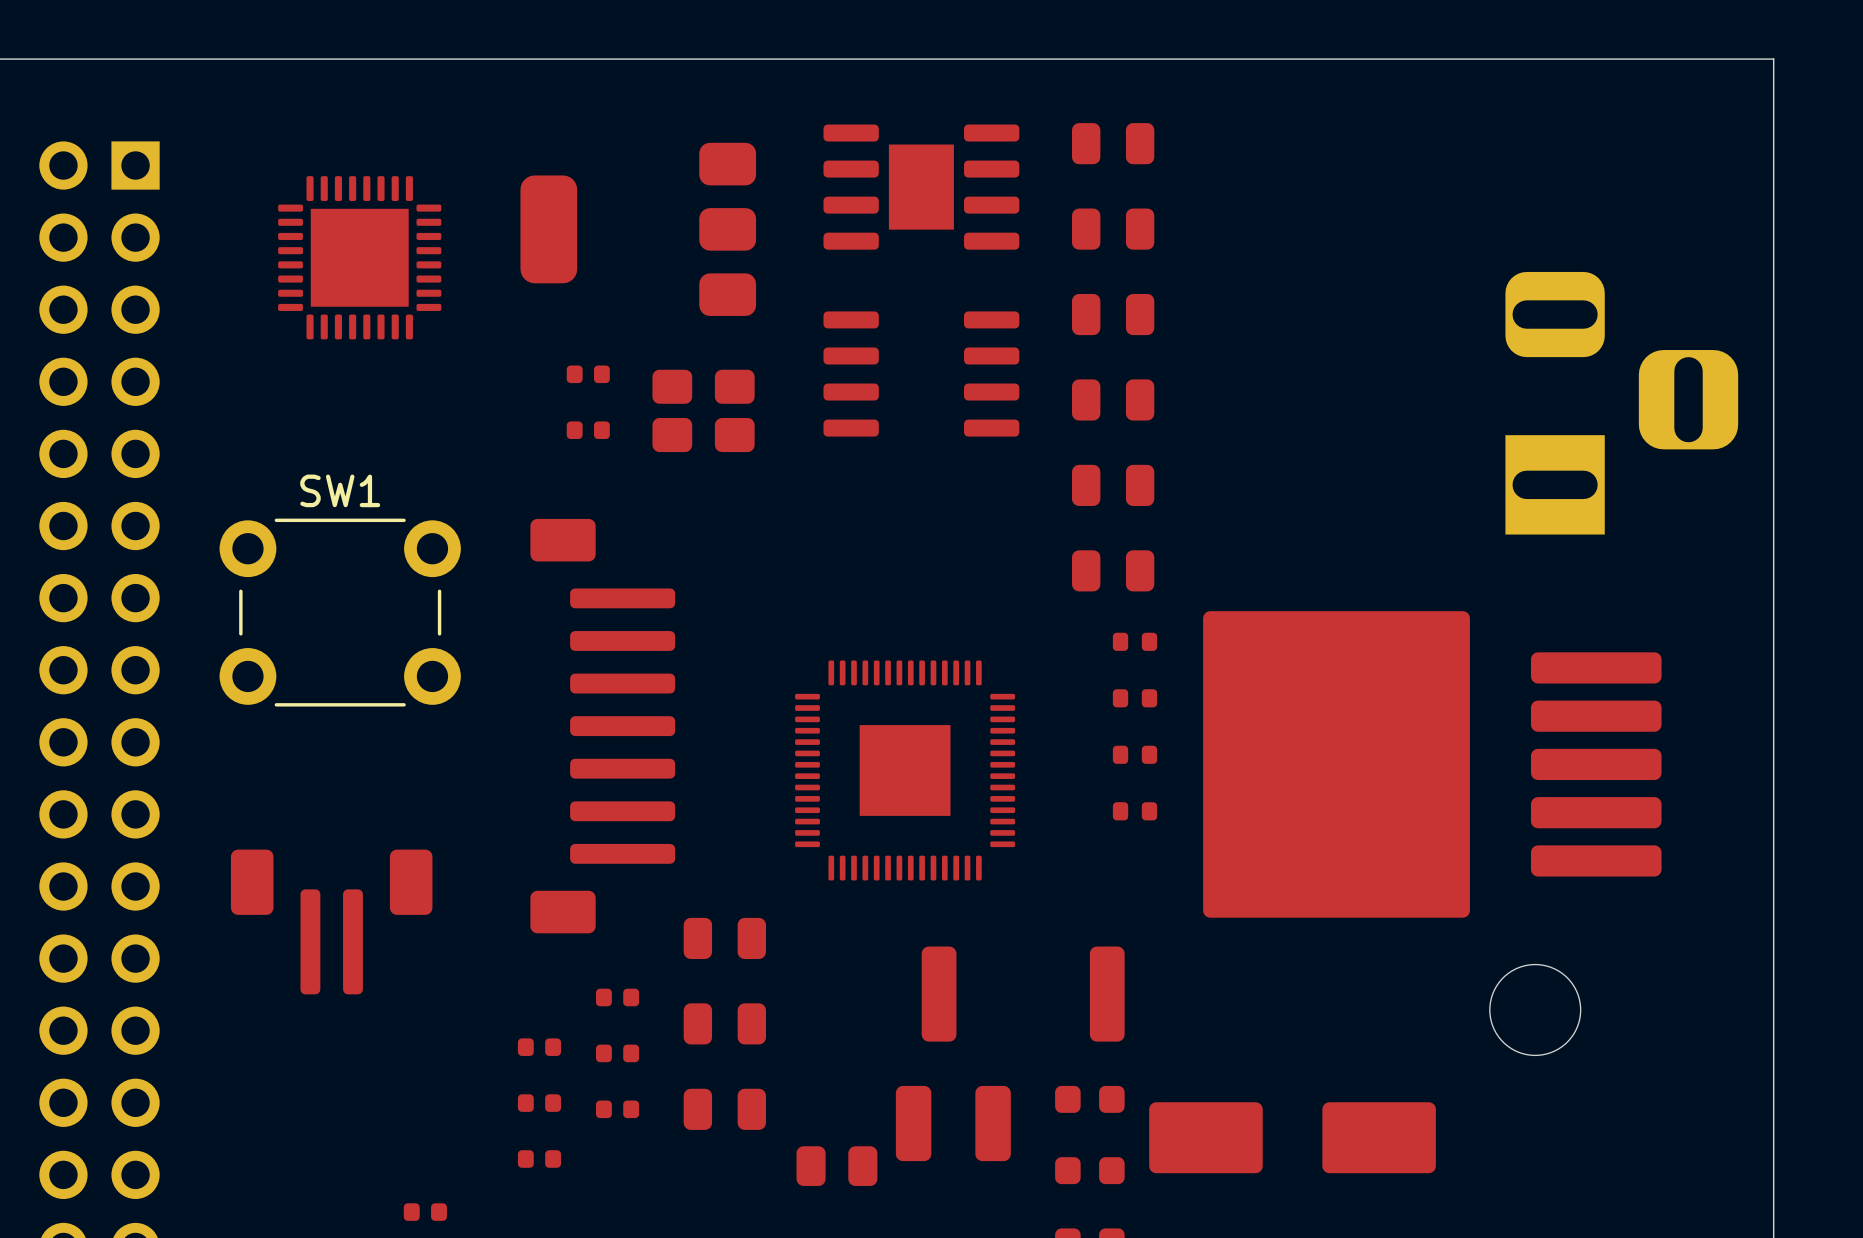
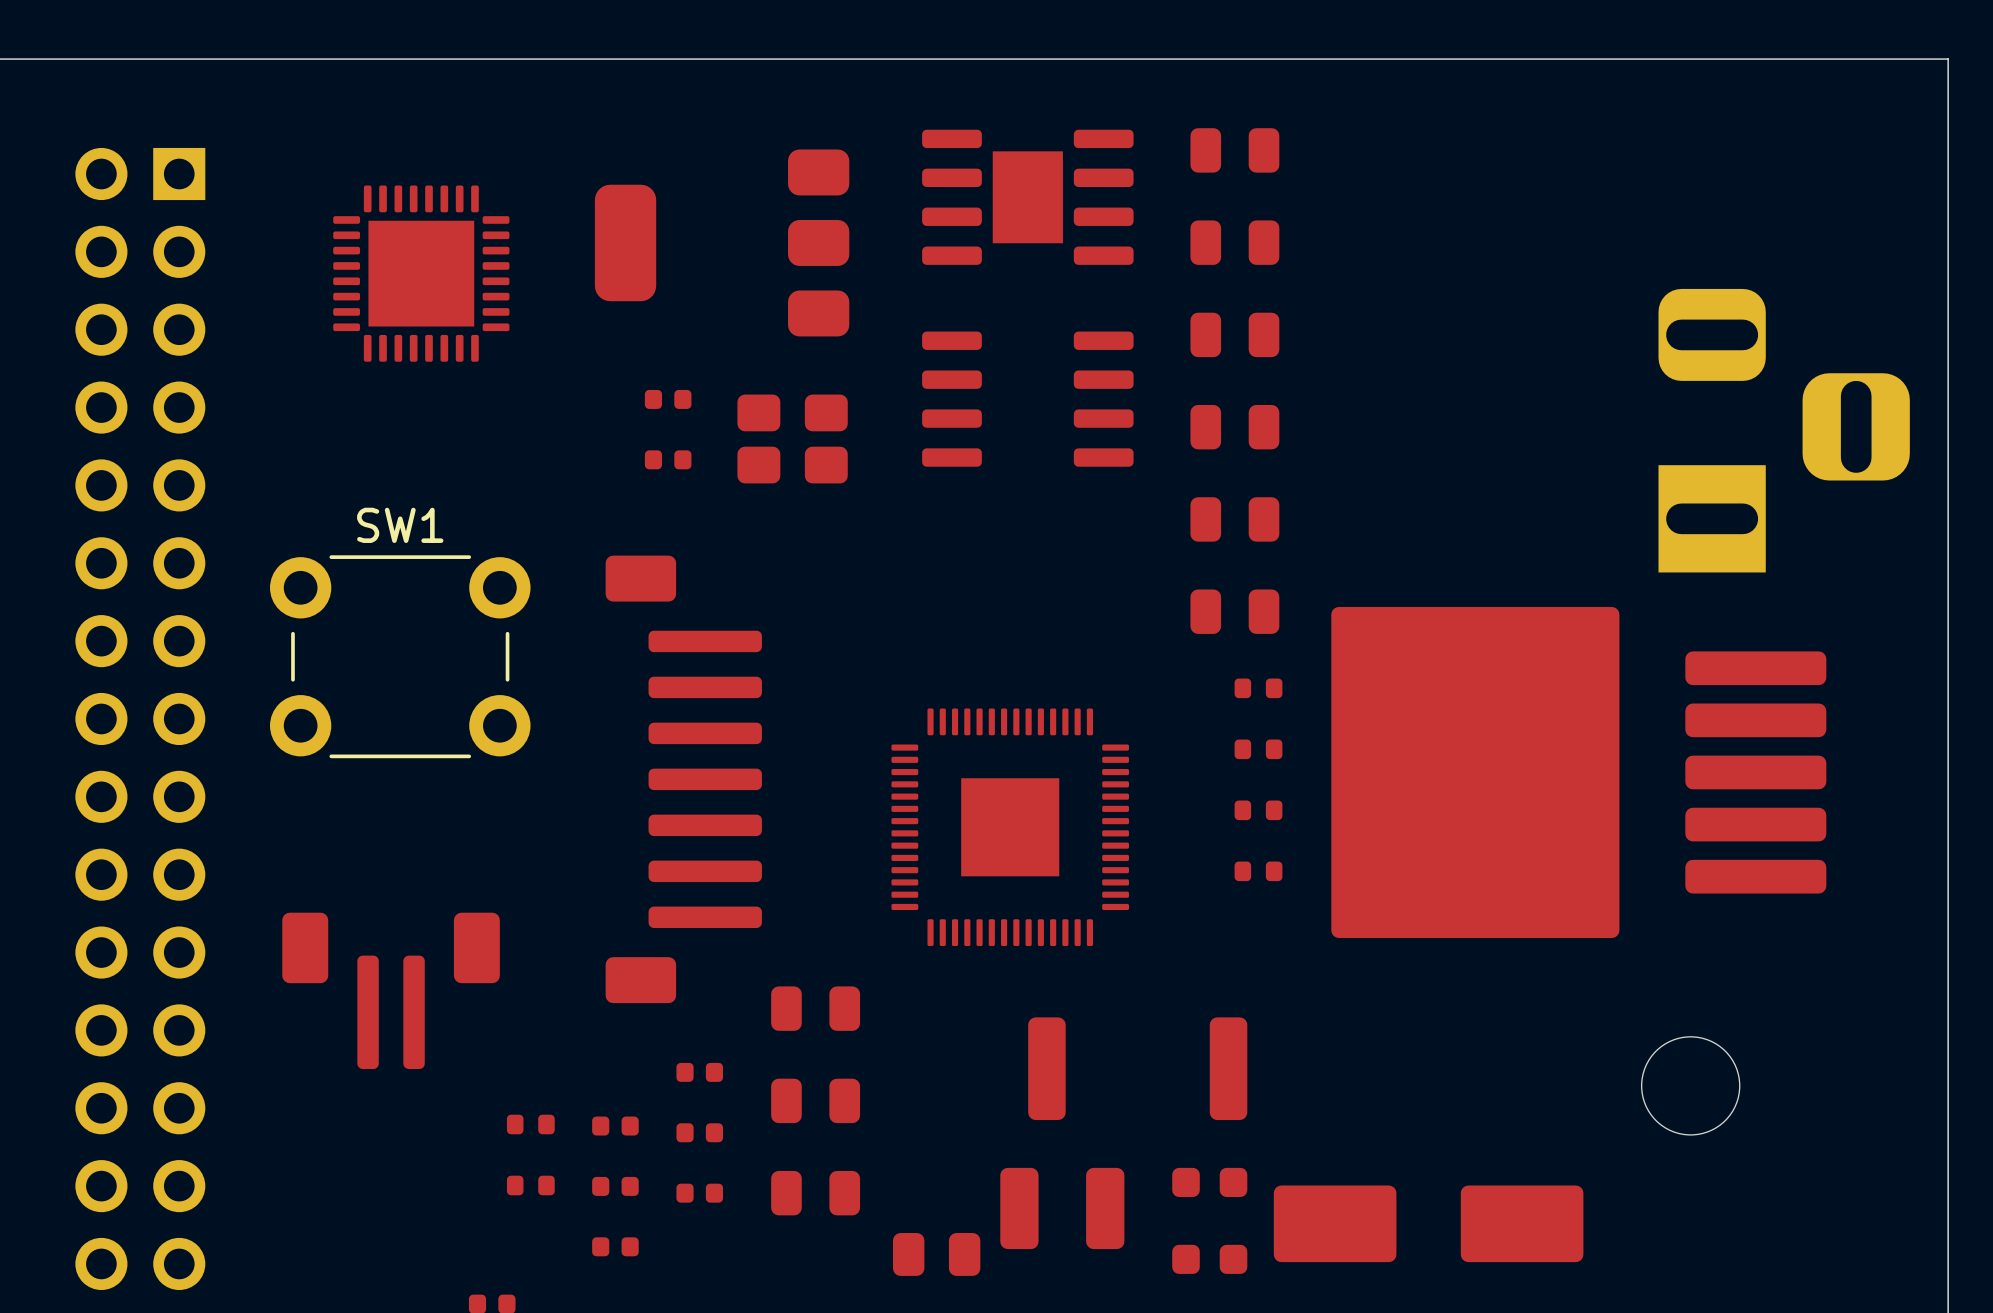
part position: (1432, 764) -> (1578, 772)
part: none -> (530, 1124)
part: none -> (530, 1185)

